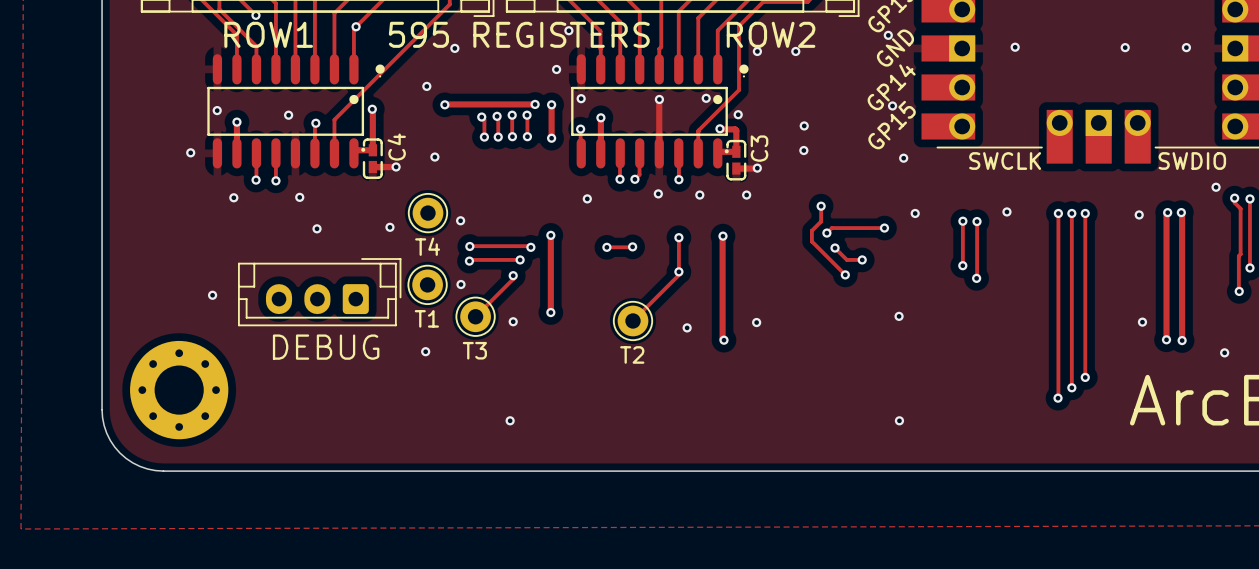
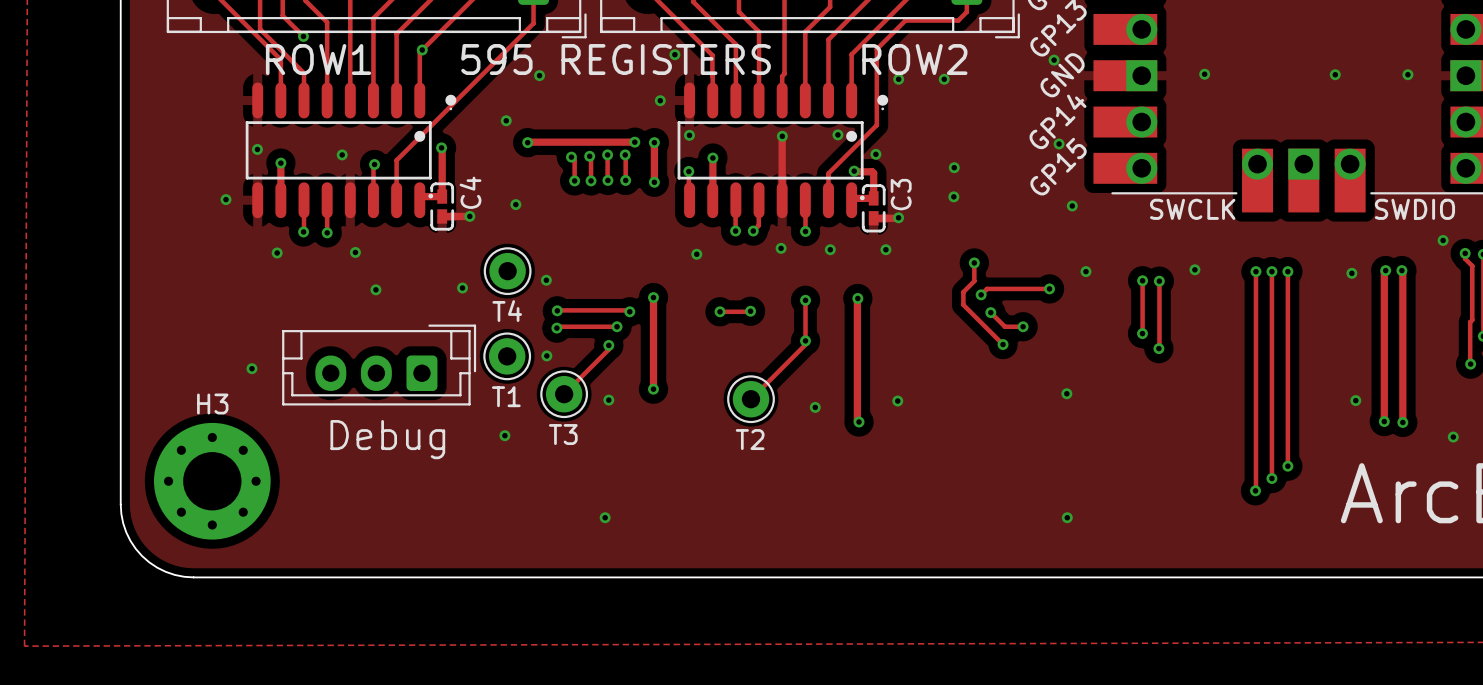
H3 name: none -> H3 (212, 403)
text: DEBUG (326, 347) -> Debug (387, 439)

